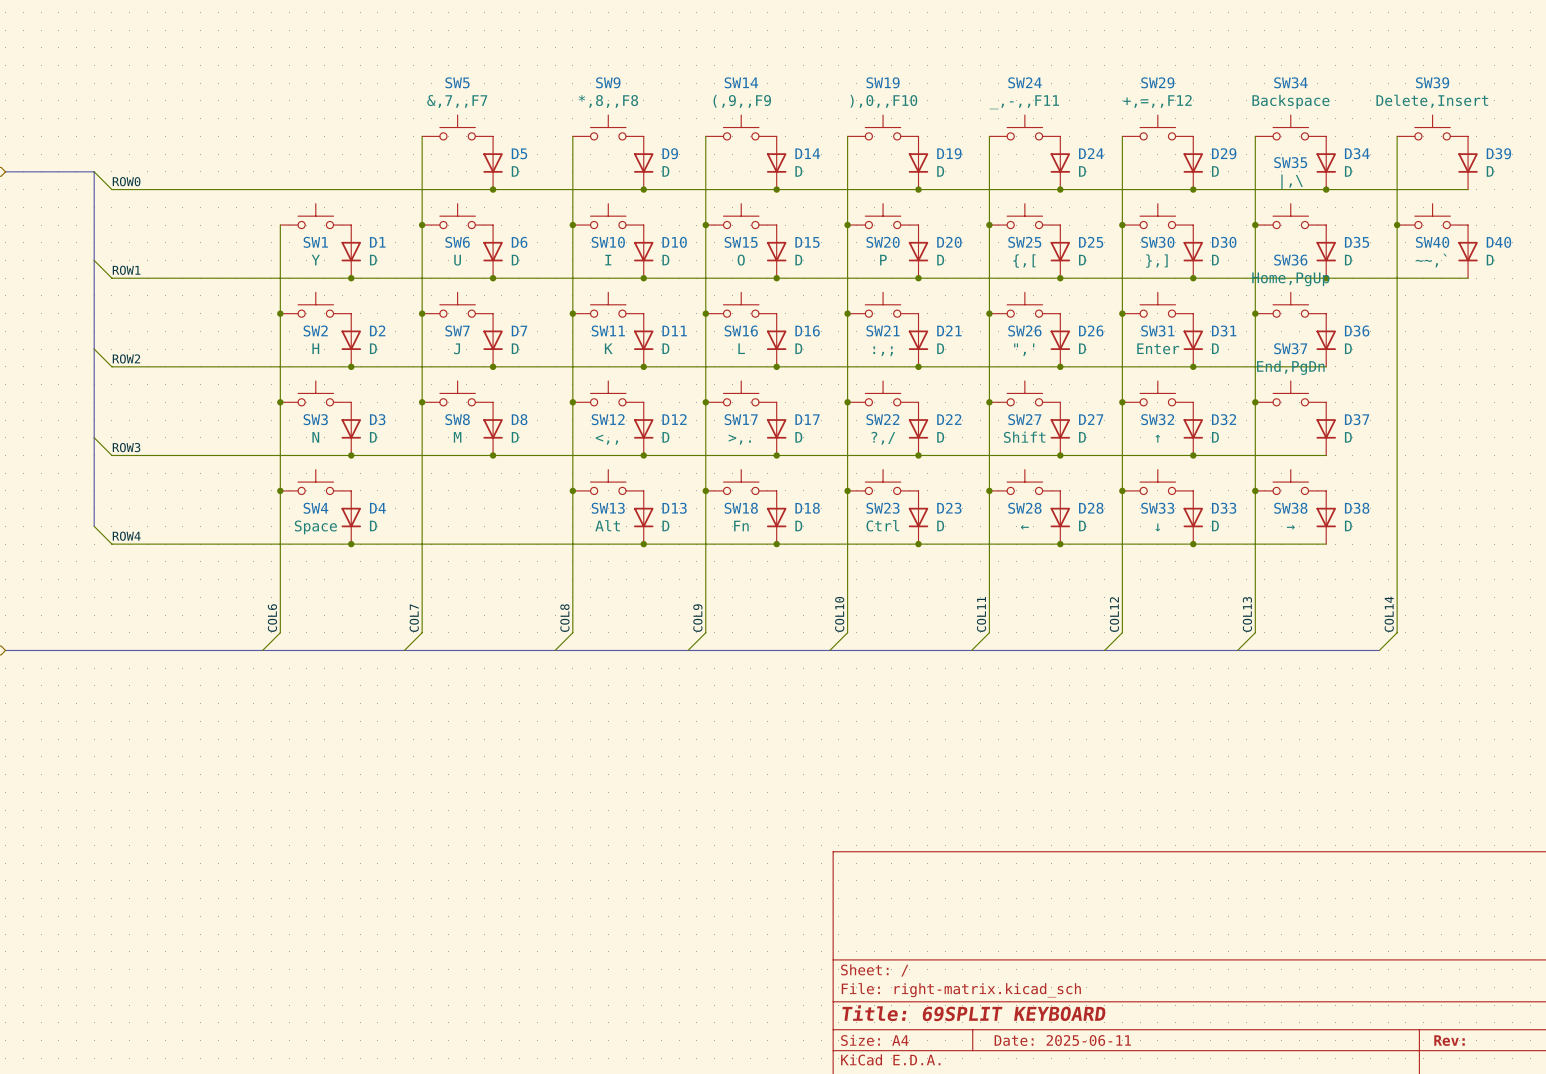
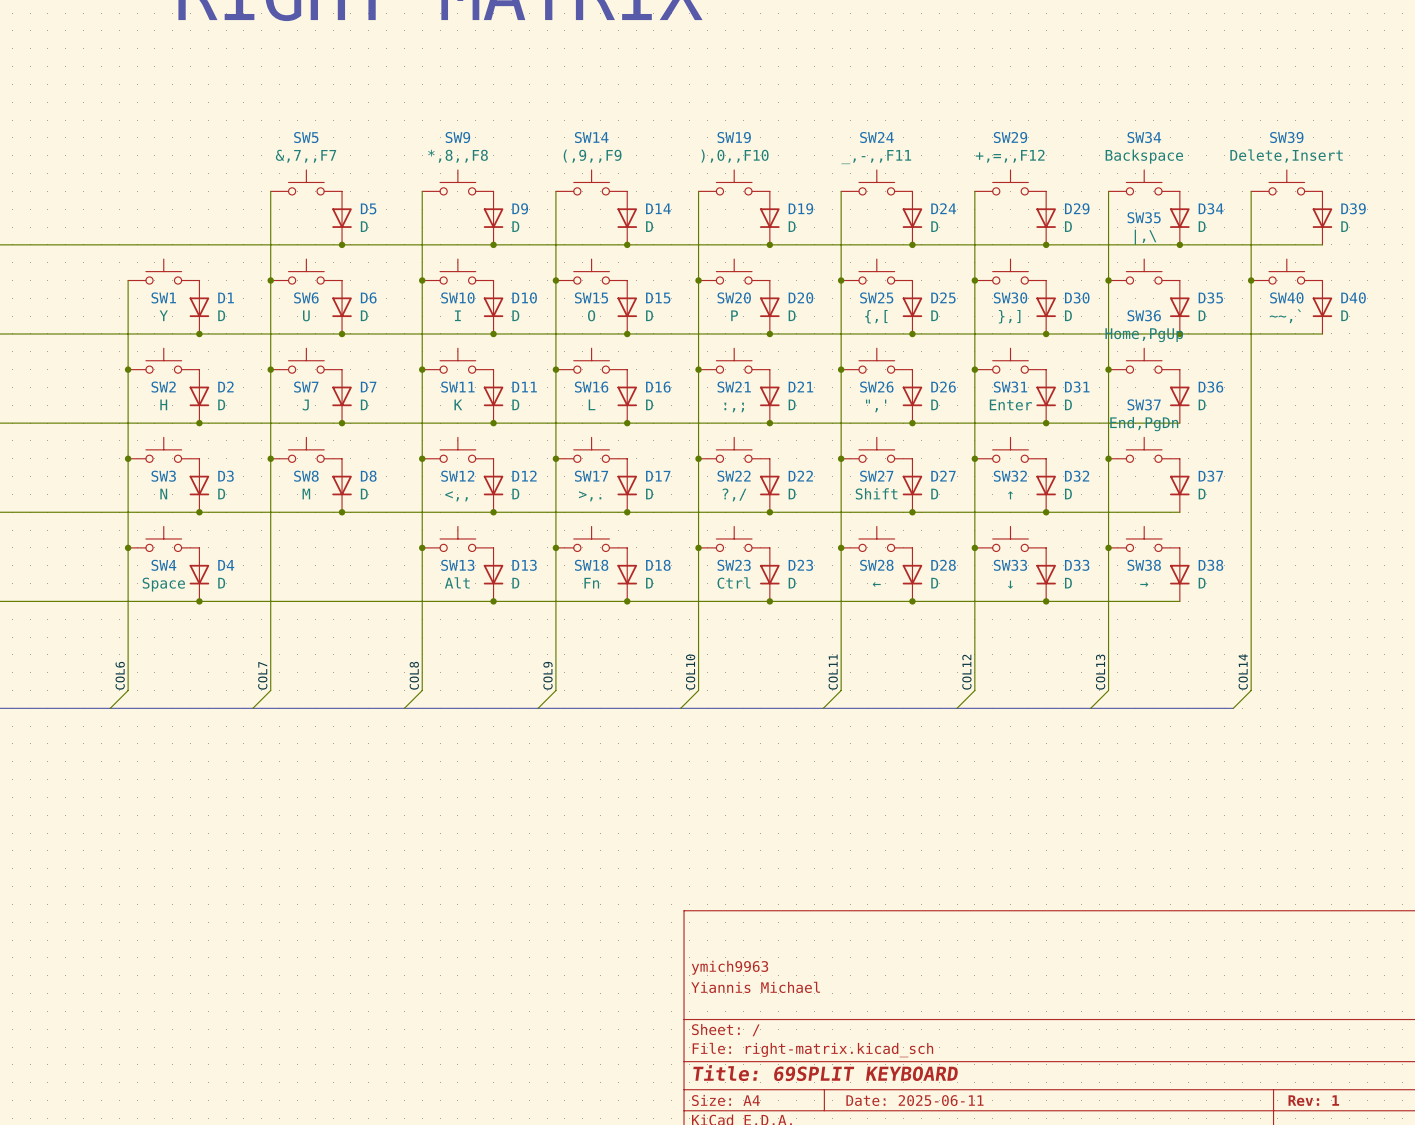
title block: none -> ymich9963 (729, 967)
title block: none -> Yiannis Michael (755, 987)
title block: Rev: (1449, 1040) -> Rev: 1 (1313, 1100)

